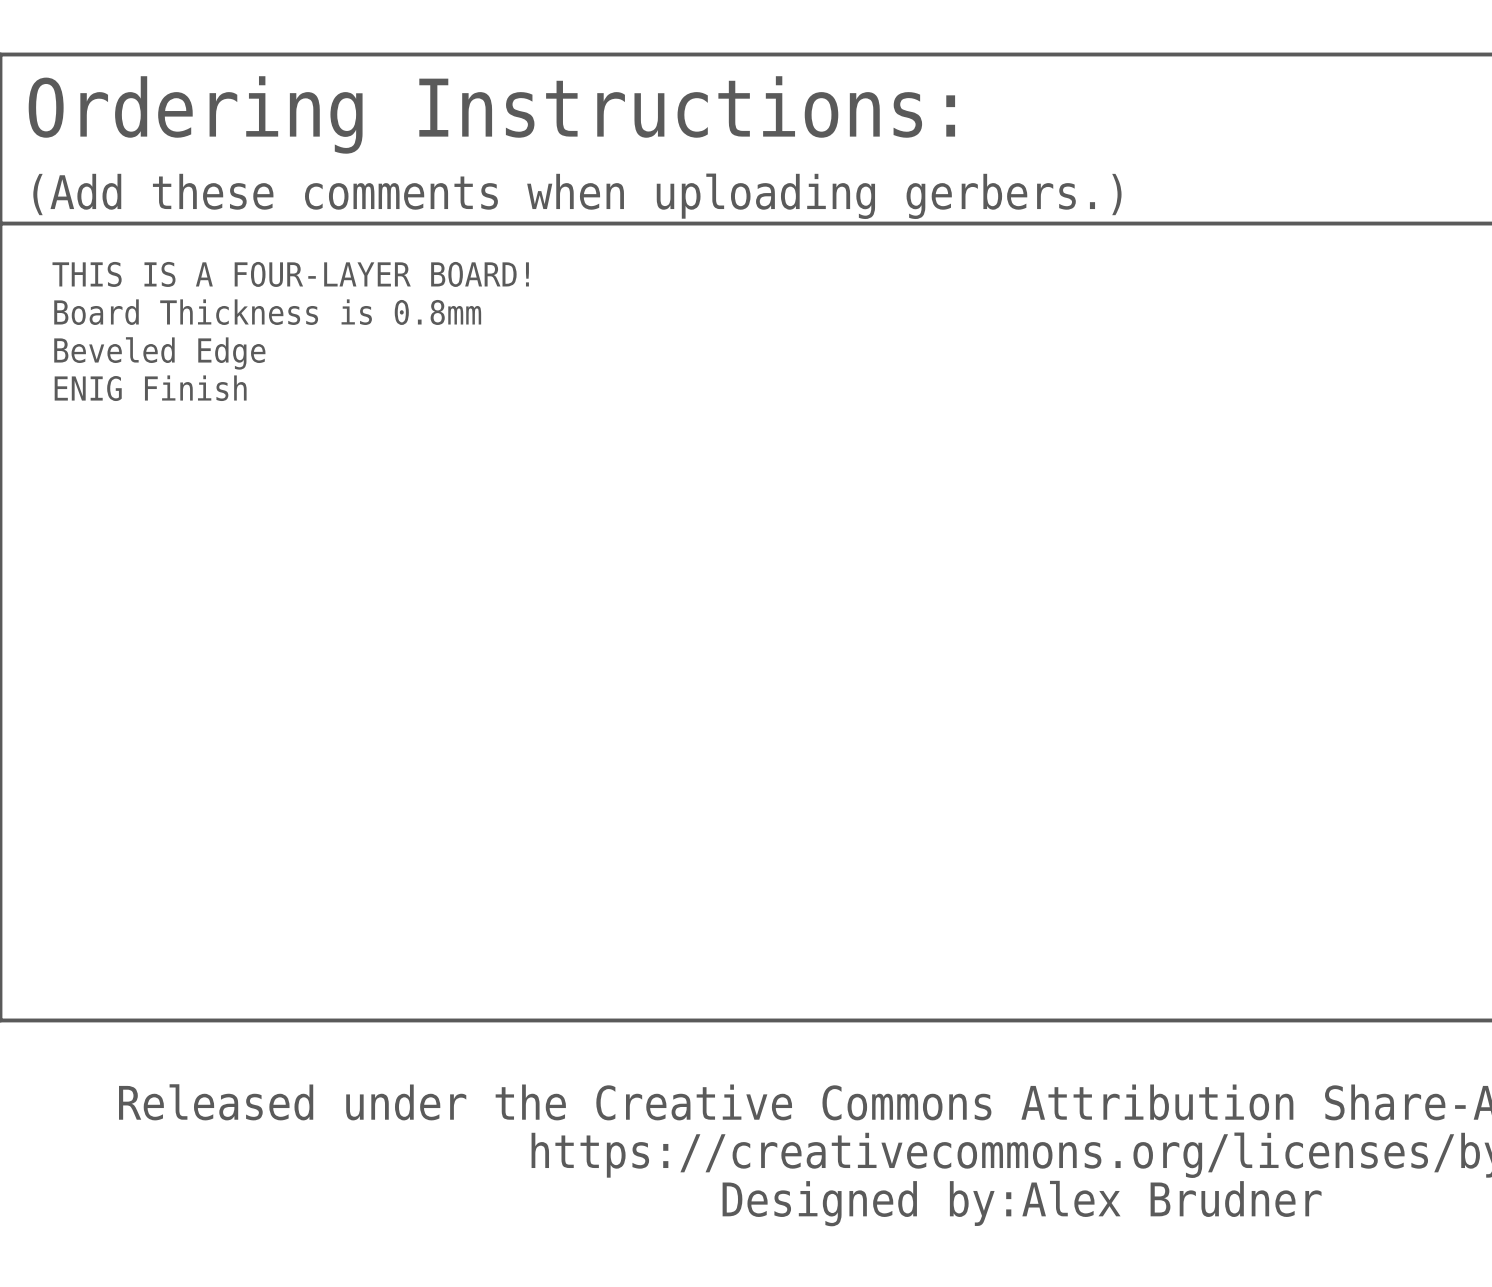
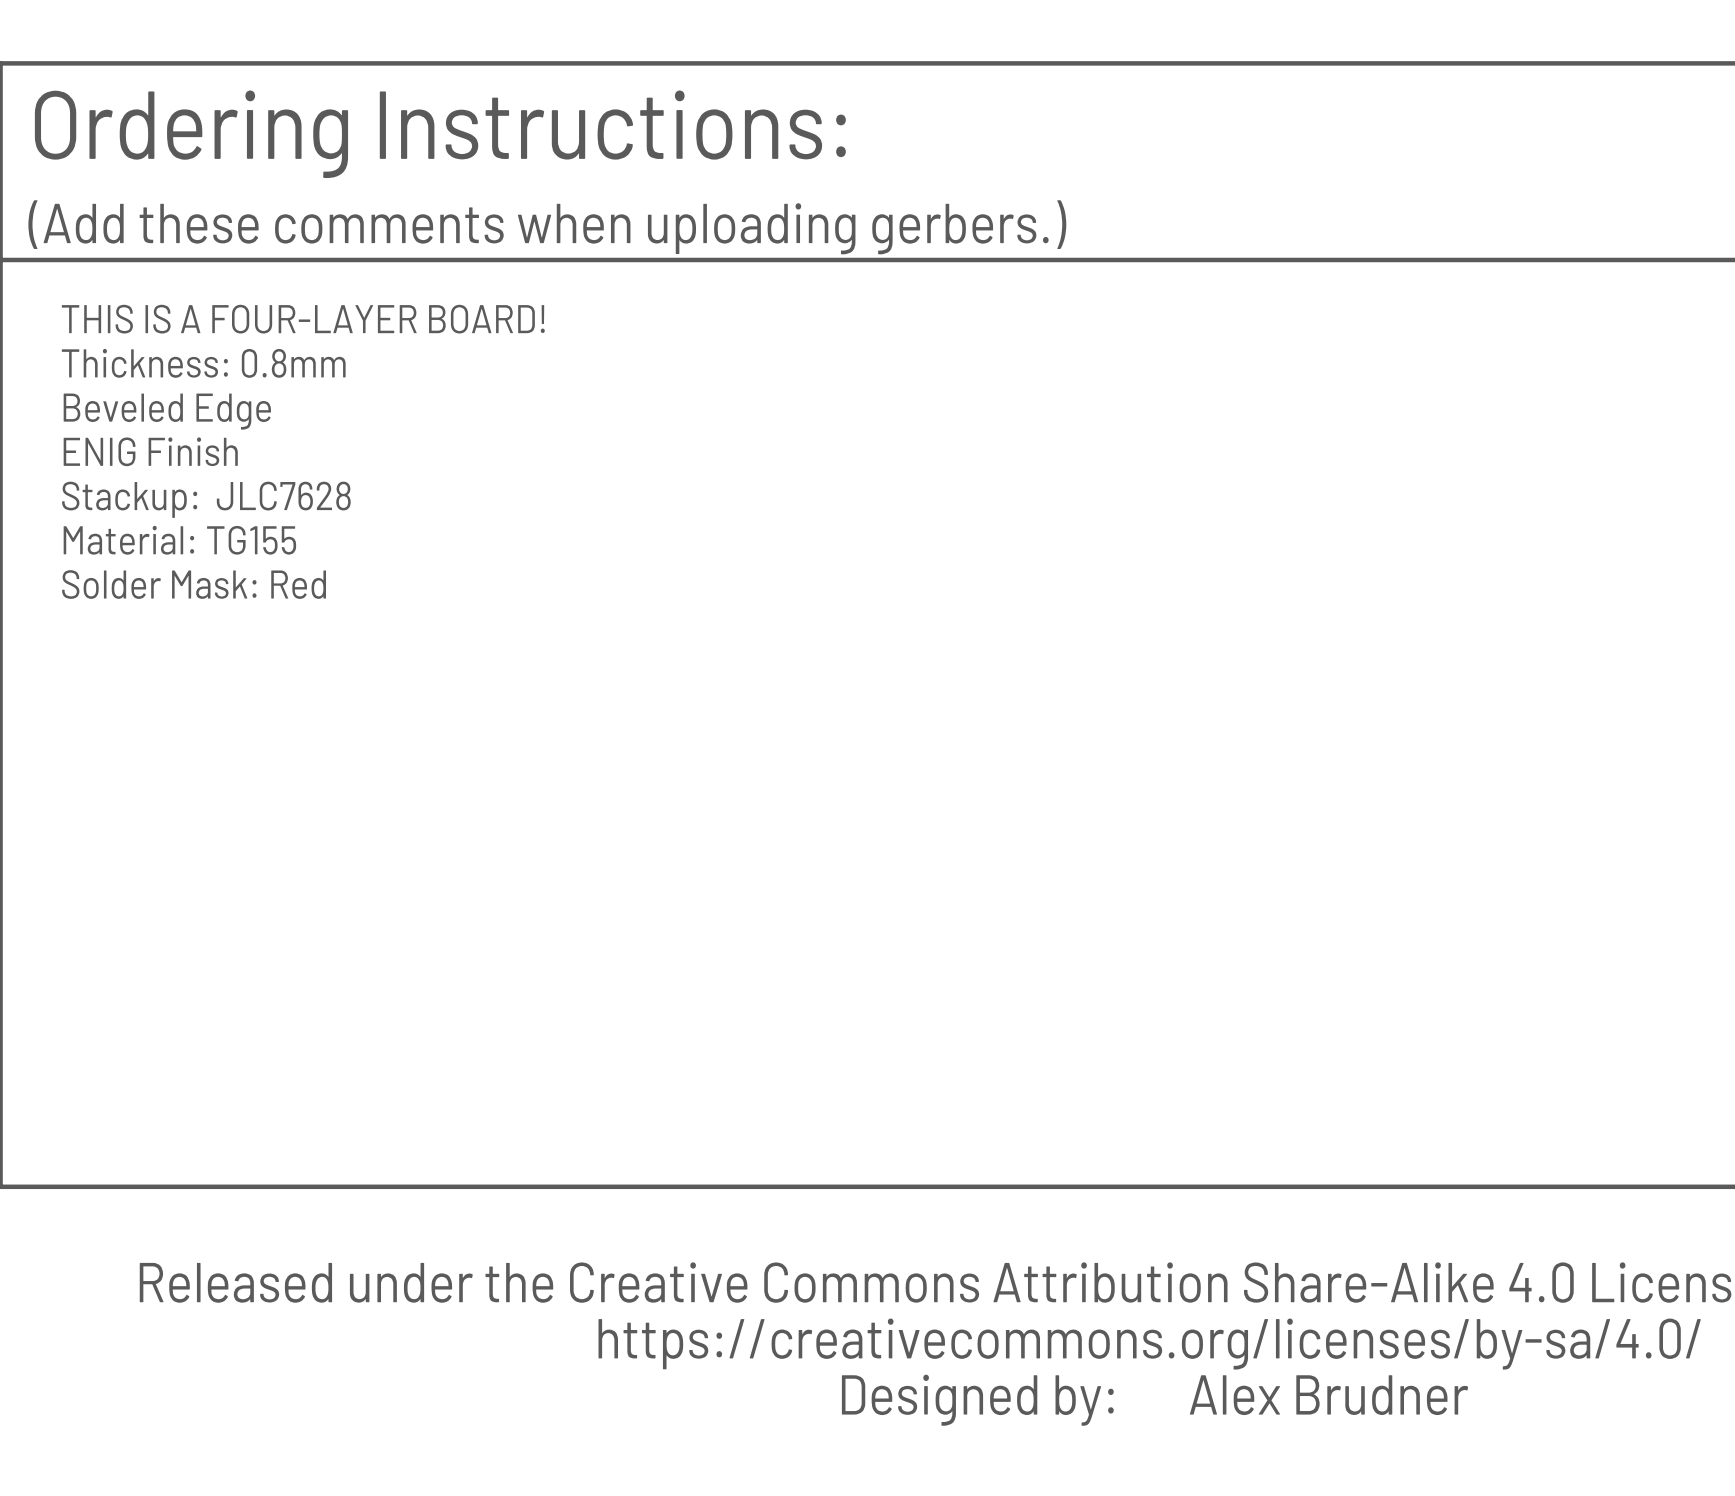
text: Board Thickness is 0.8mm (267, 312) -> Thickness: 0.8mm (203, 363)
text: none -> Stackup: JLC7628 (206, 499)
text: none -> Material: TG155 (179, 540)
text: none -> Solder Mask: Red (194, 584)

